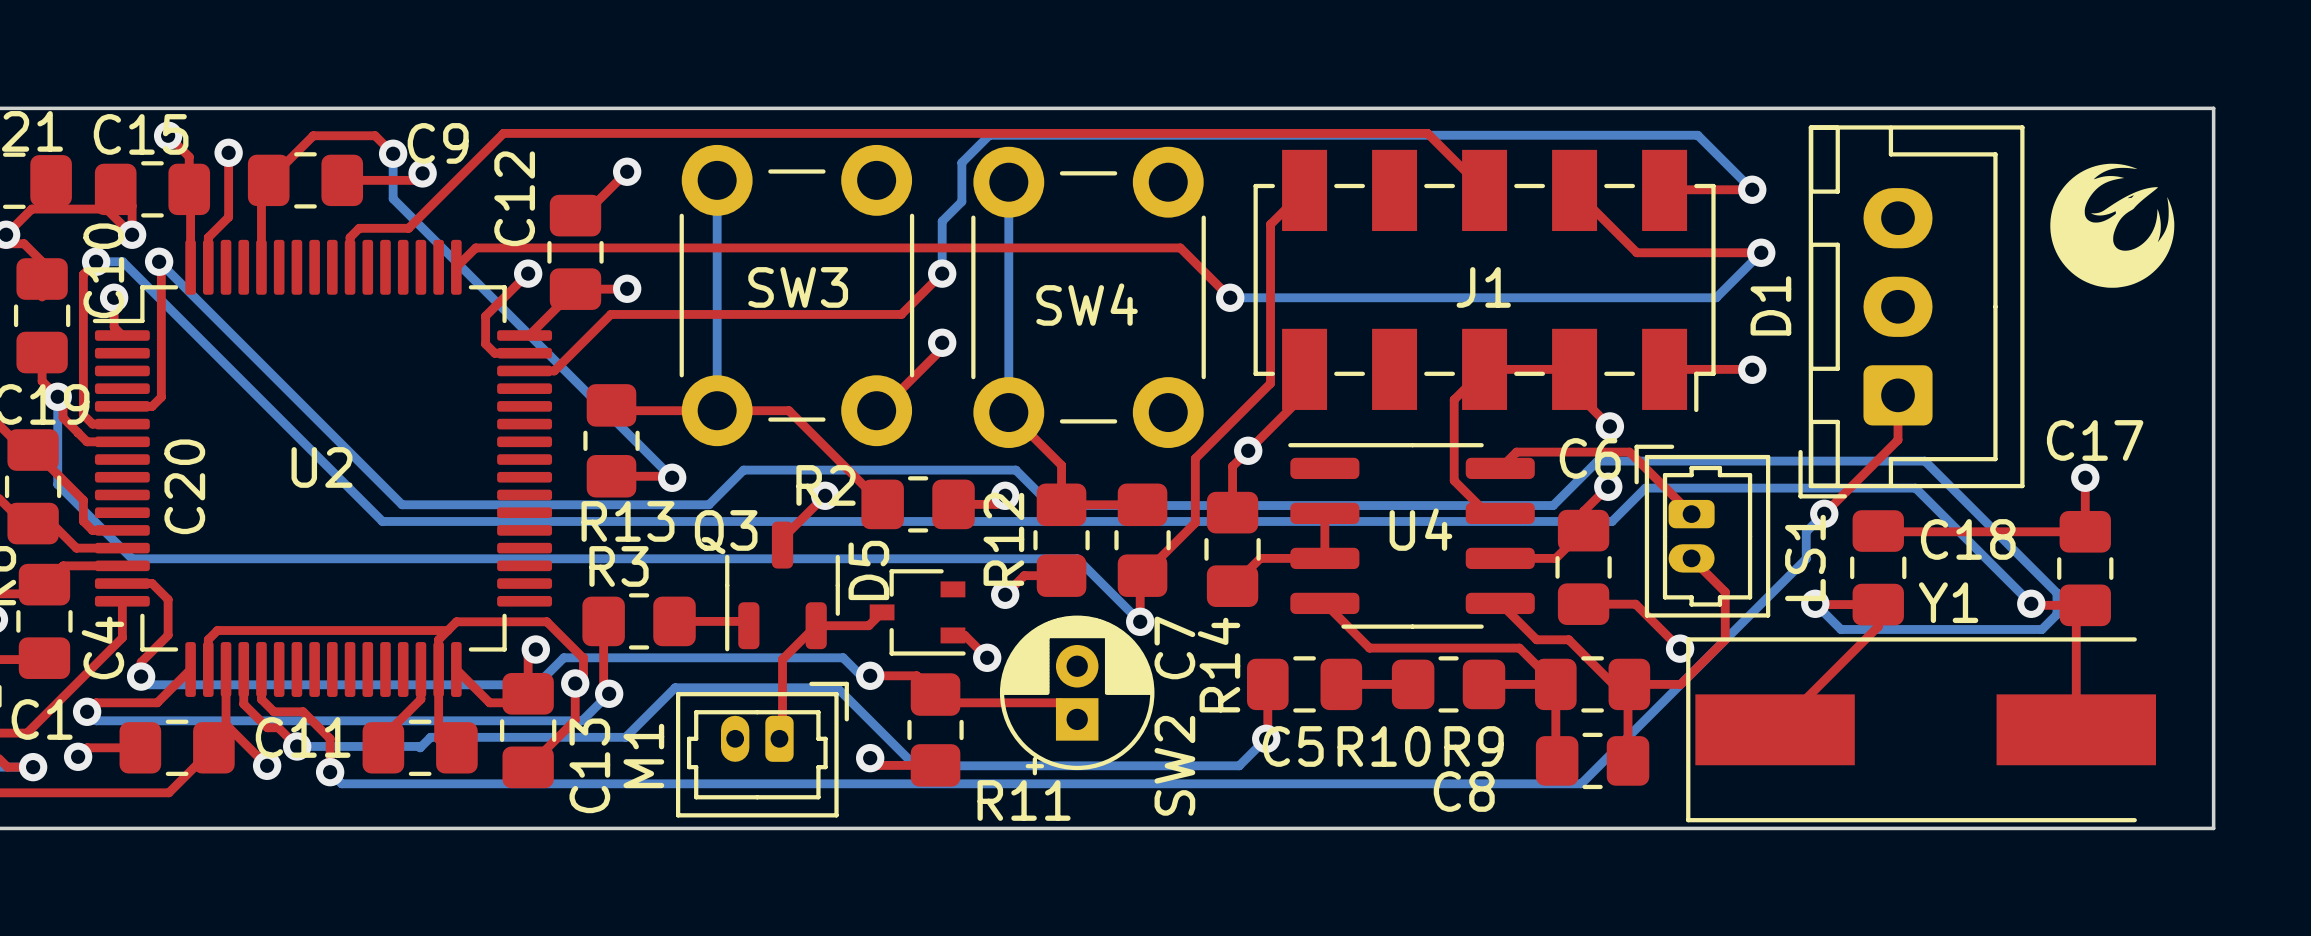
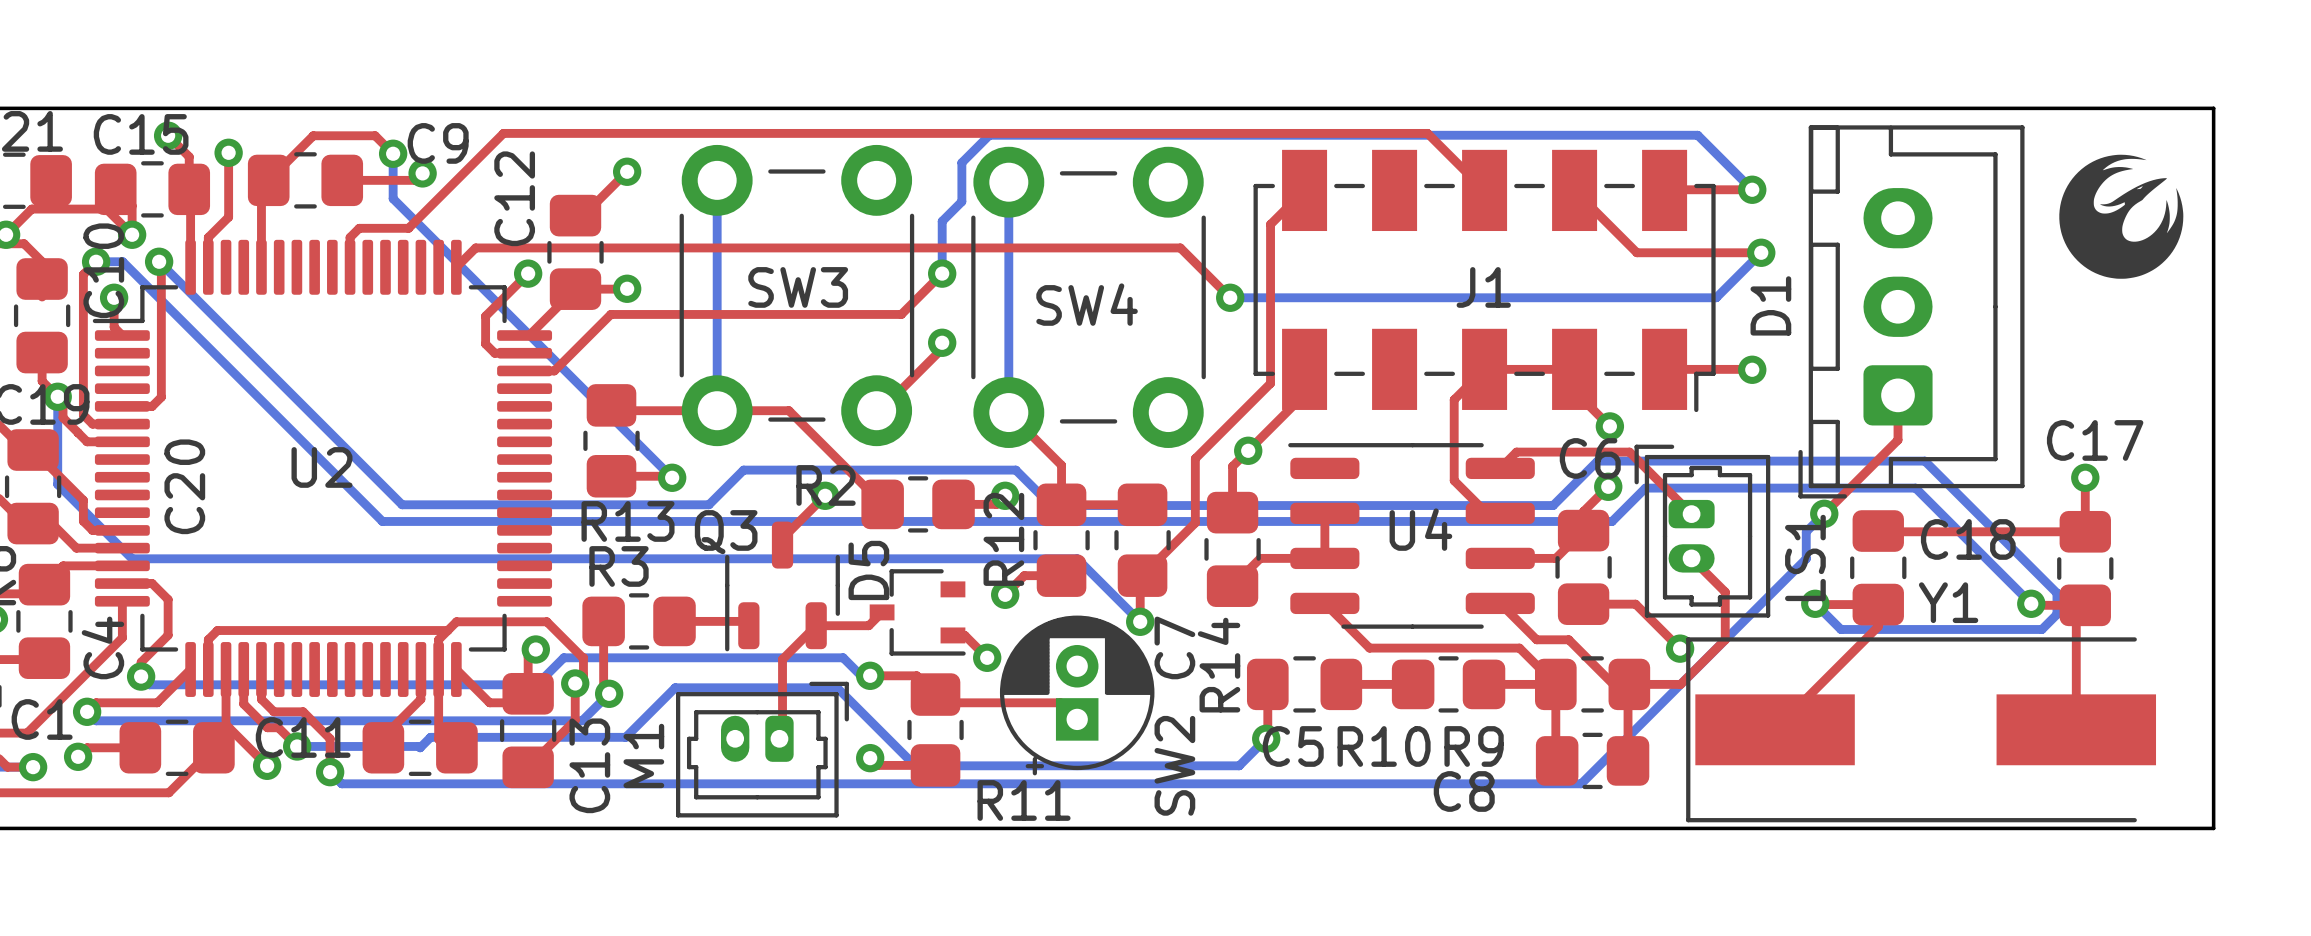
drawing position: (2112, 225) -> (2121, 216)

